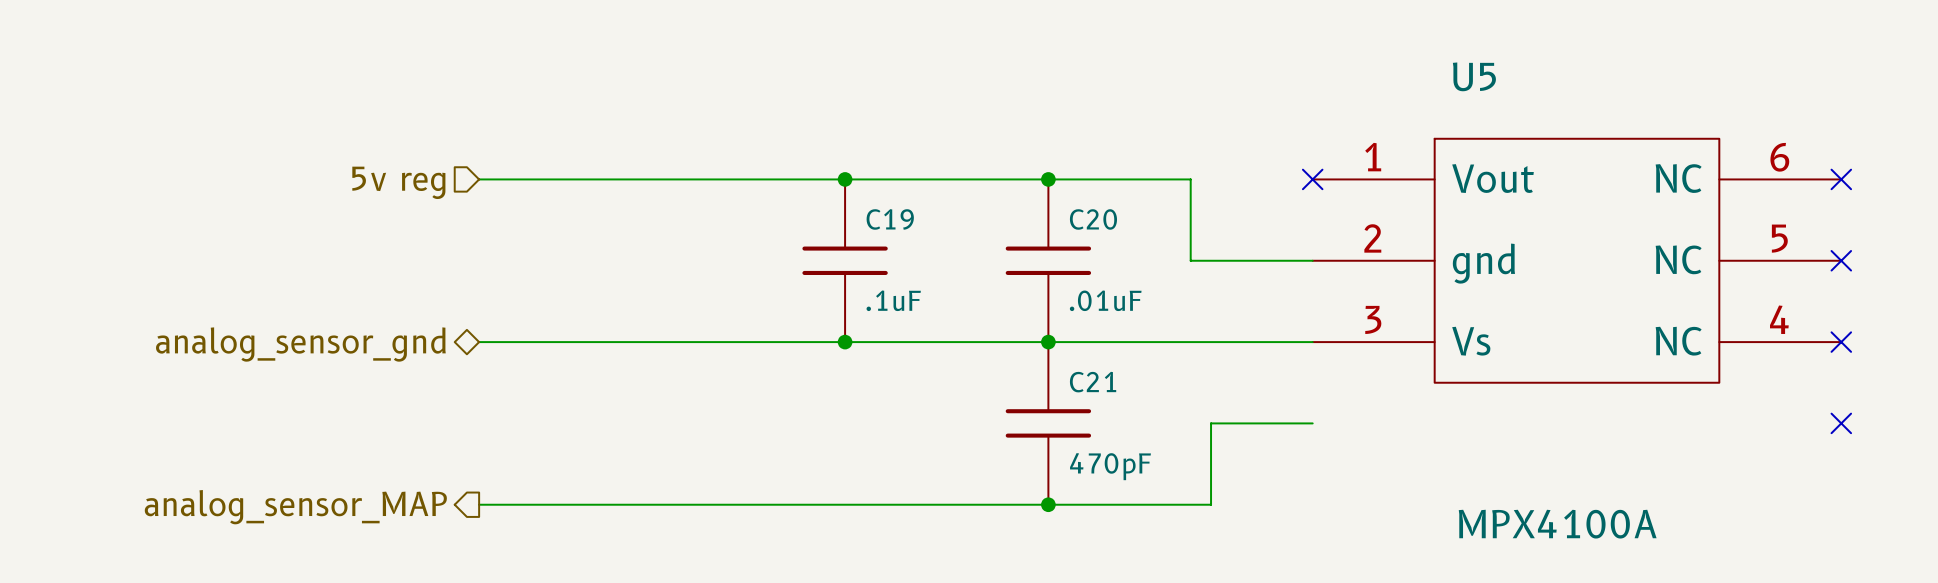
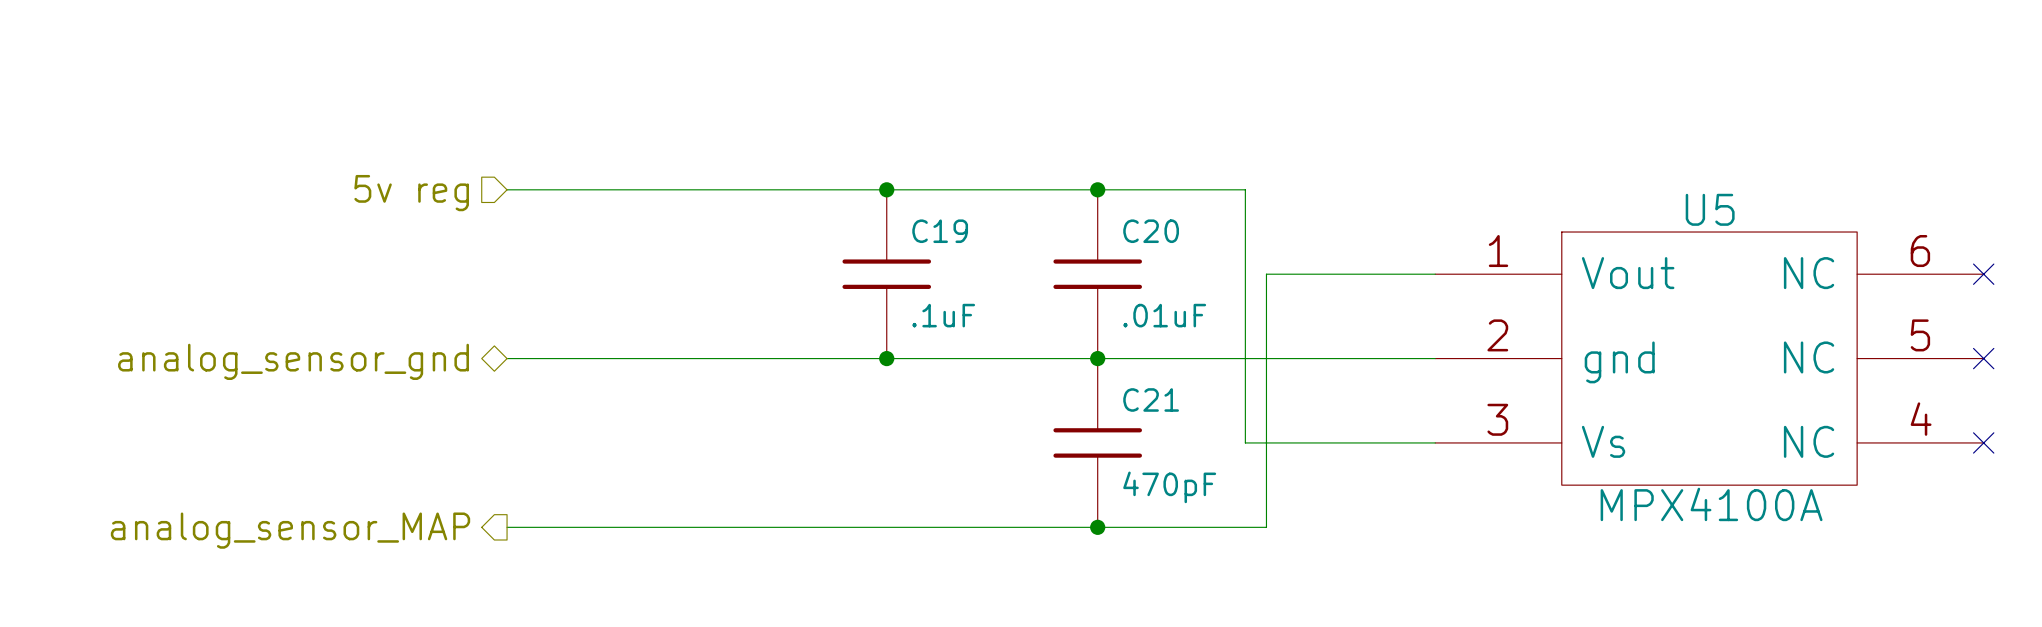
U5 name position: U5 (1474, 76) -> U5 (1710, 209)
no-connect mark: (1312, 179) -> none
no-connect mark: (1841, 179) -> none
wire: (1190, 260) (1211, 260) -> (1245, 274) (1245, 442) (1266, 442) (1266, 274)
U5 position: (1577, 260) -> (1709, 358)
no-connect mark: (1841, 260) -> none
no-connect mark: none -> (1983, 274)
no-connect mark: (1841, 342) -> none
no-connect mark: none -> (1983, 358)
wire: none -> (1371, 442) (1435, 442)
no-connect mark: (1841, 423) -> none
no-connect mark: none -> (1983, 442)
U5 value position: MPX4100A (1557, 524) -> MPX4100A (1711, 504)

